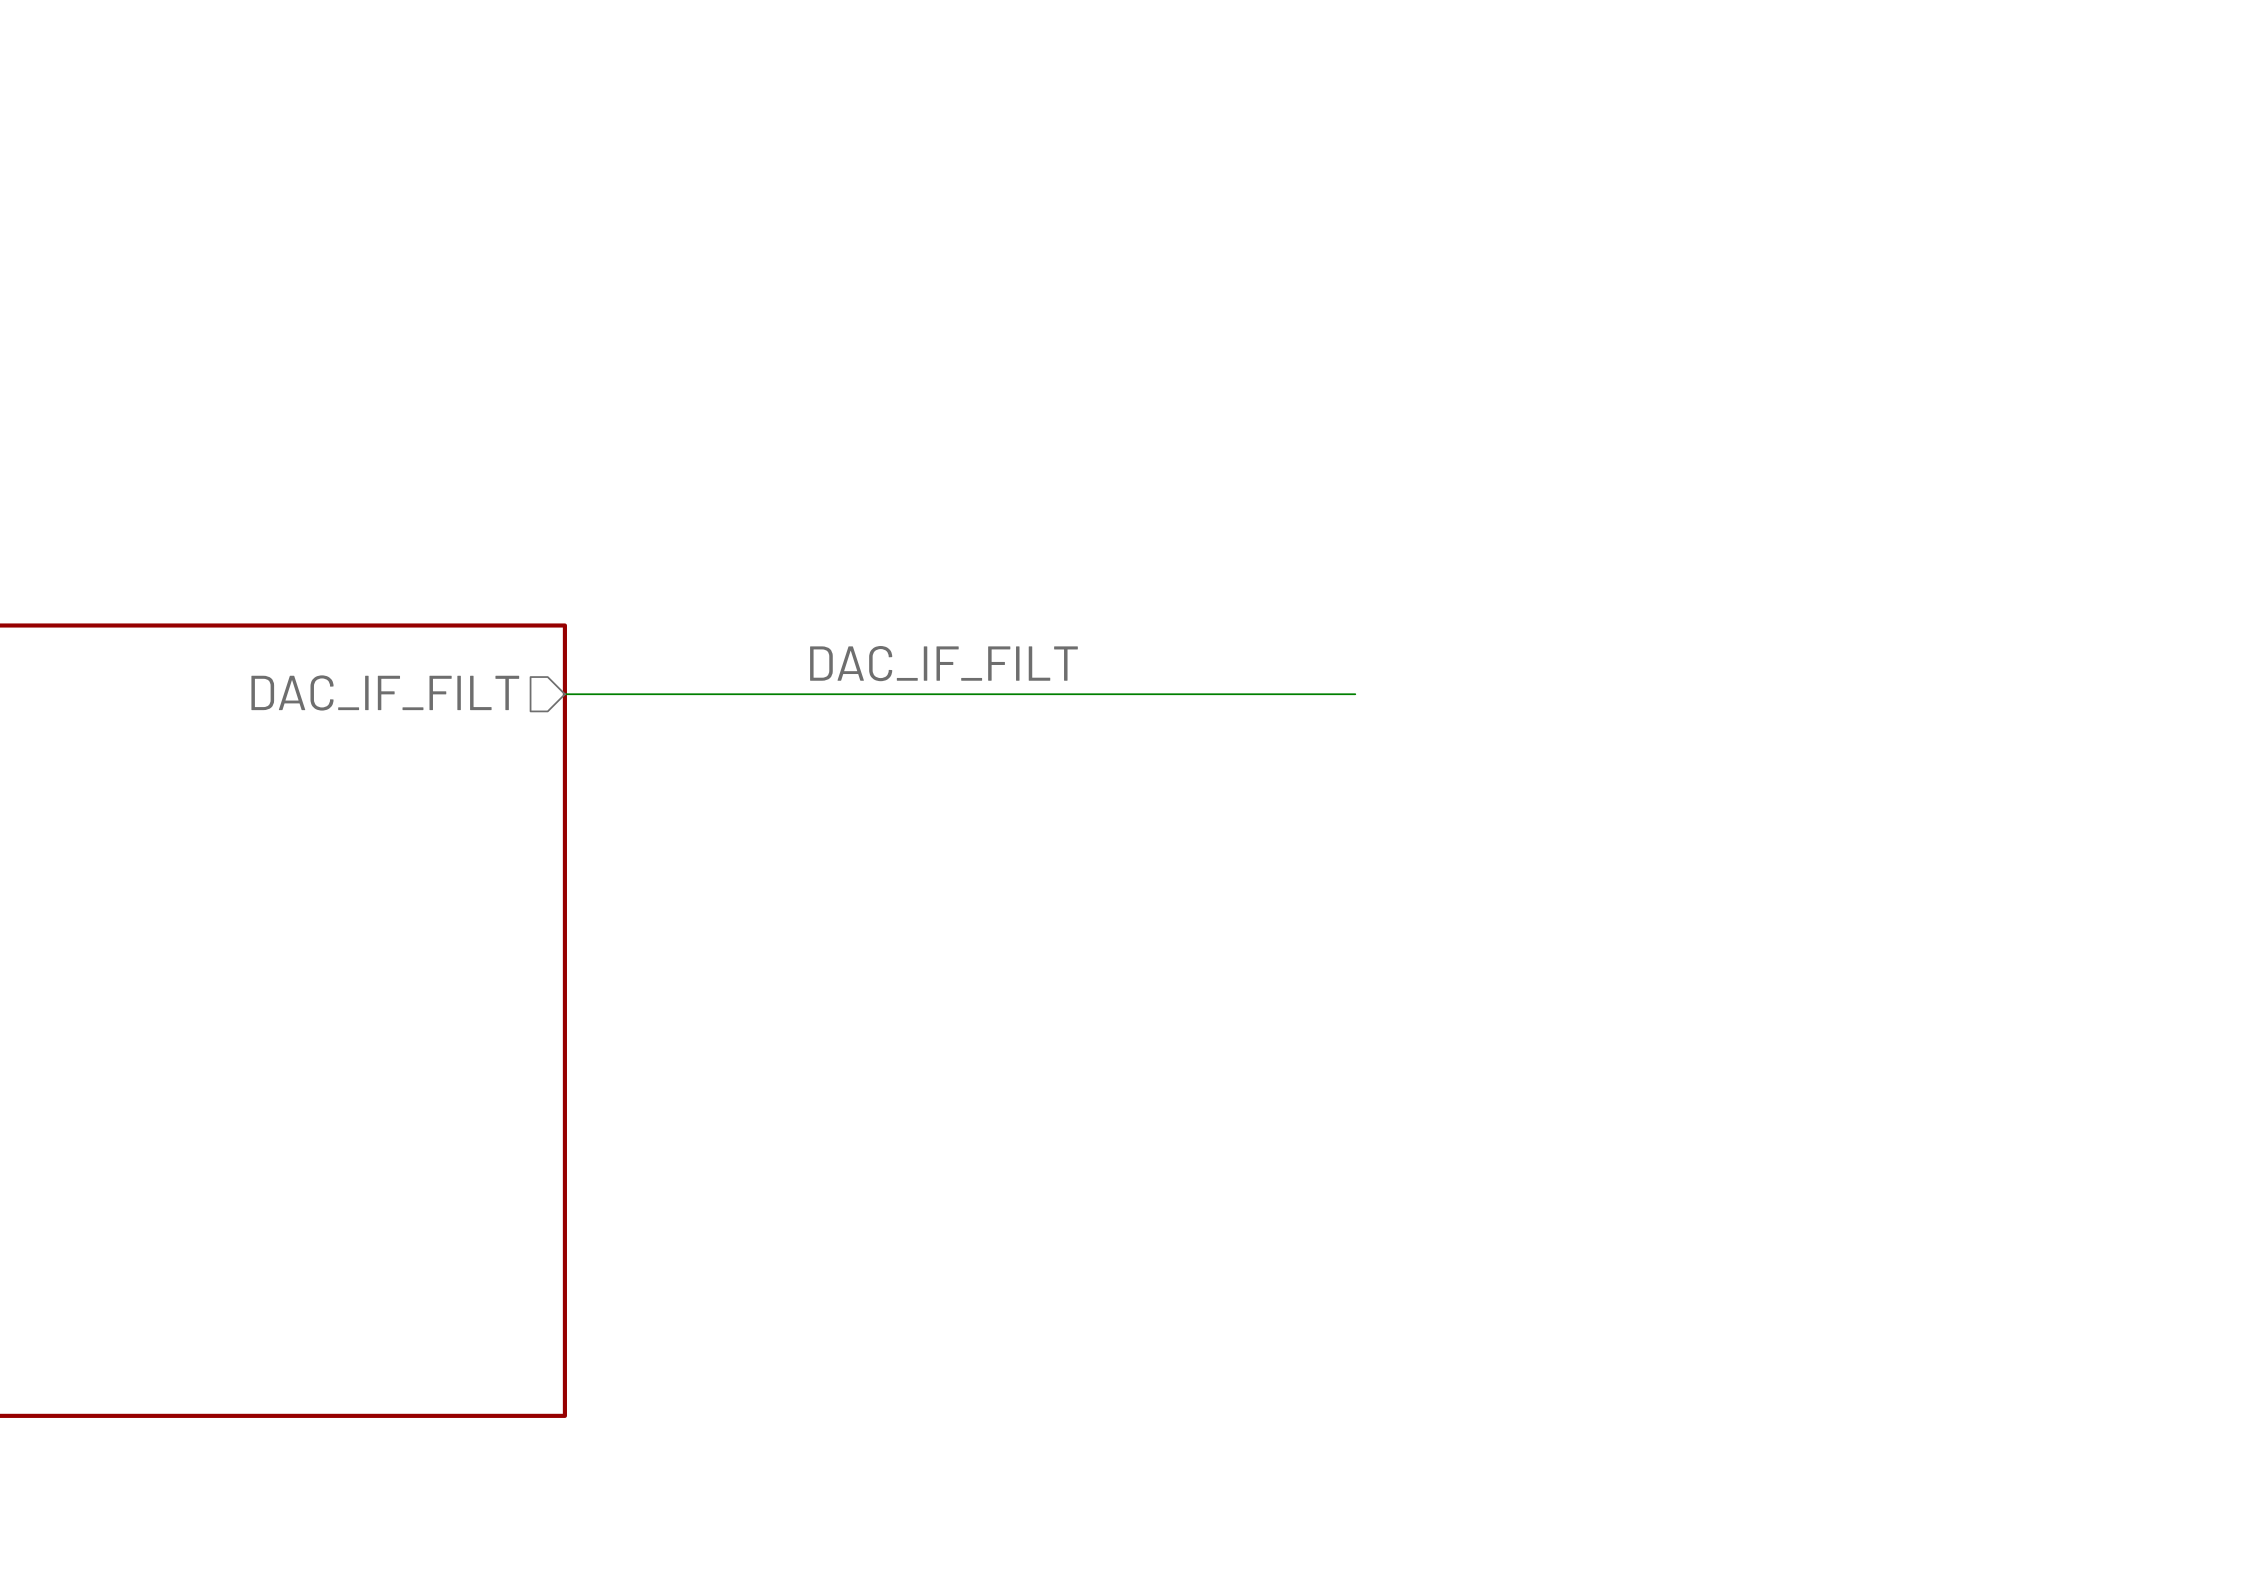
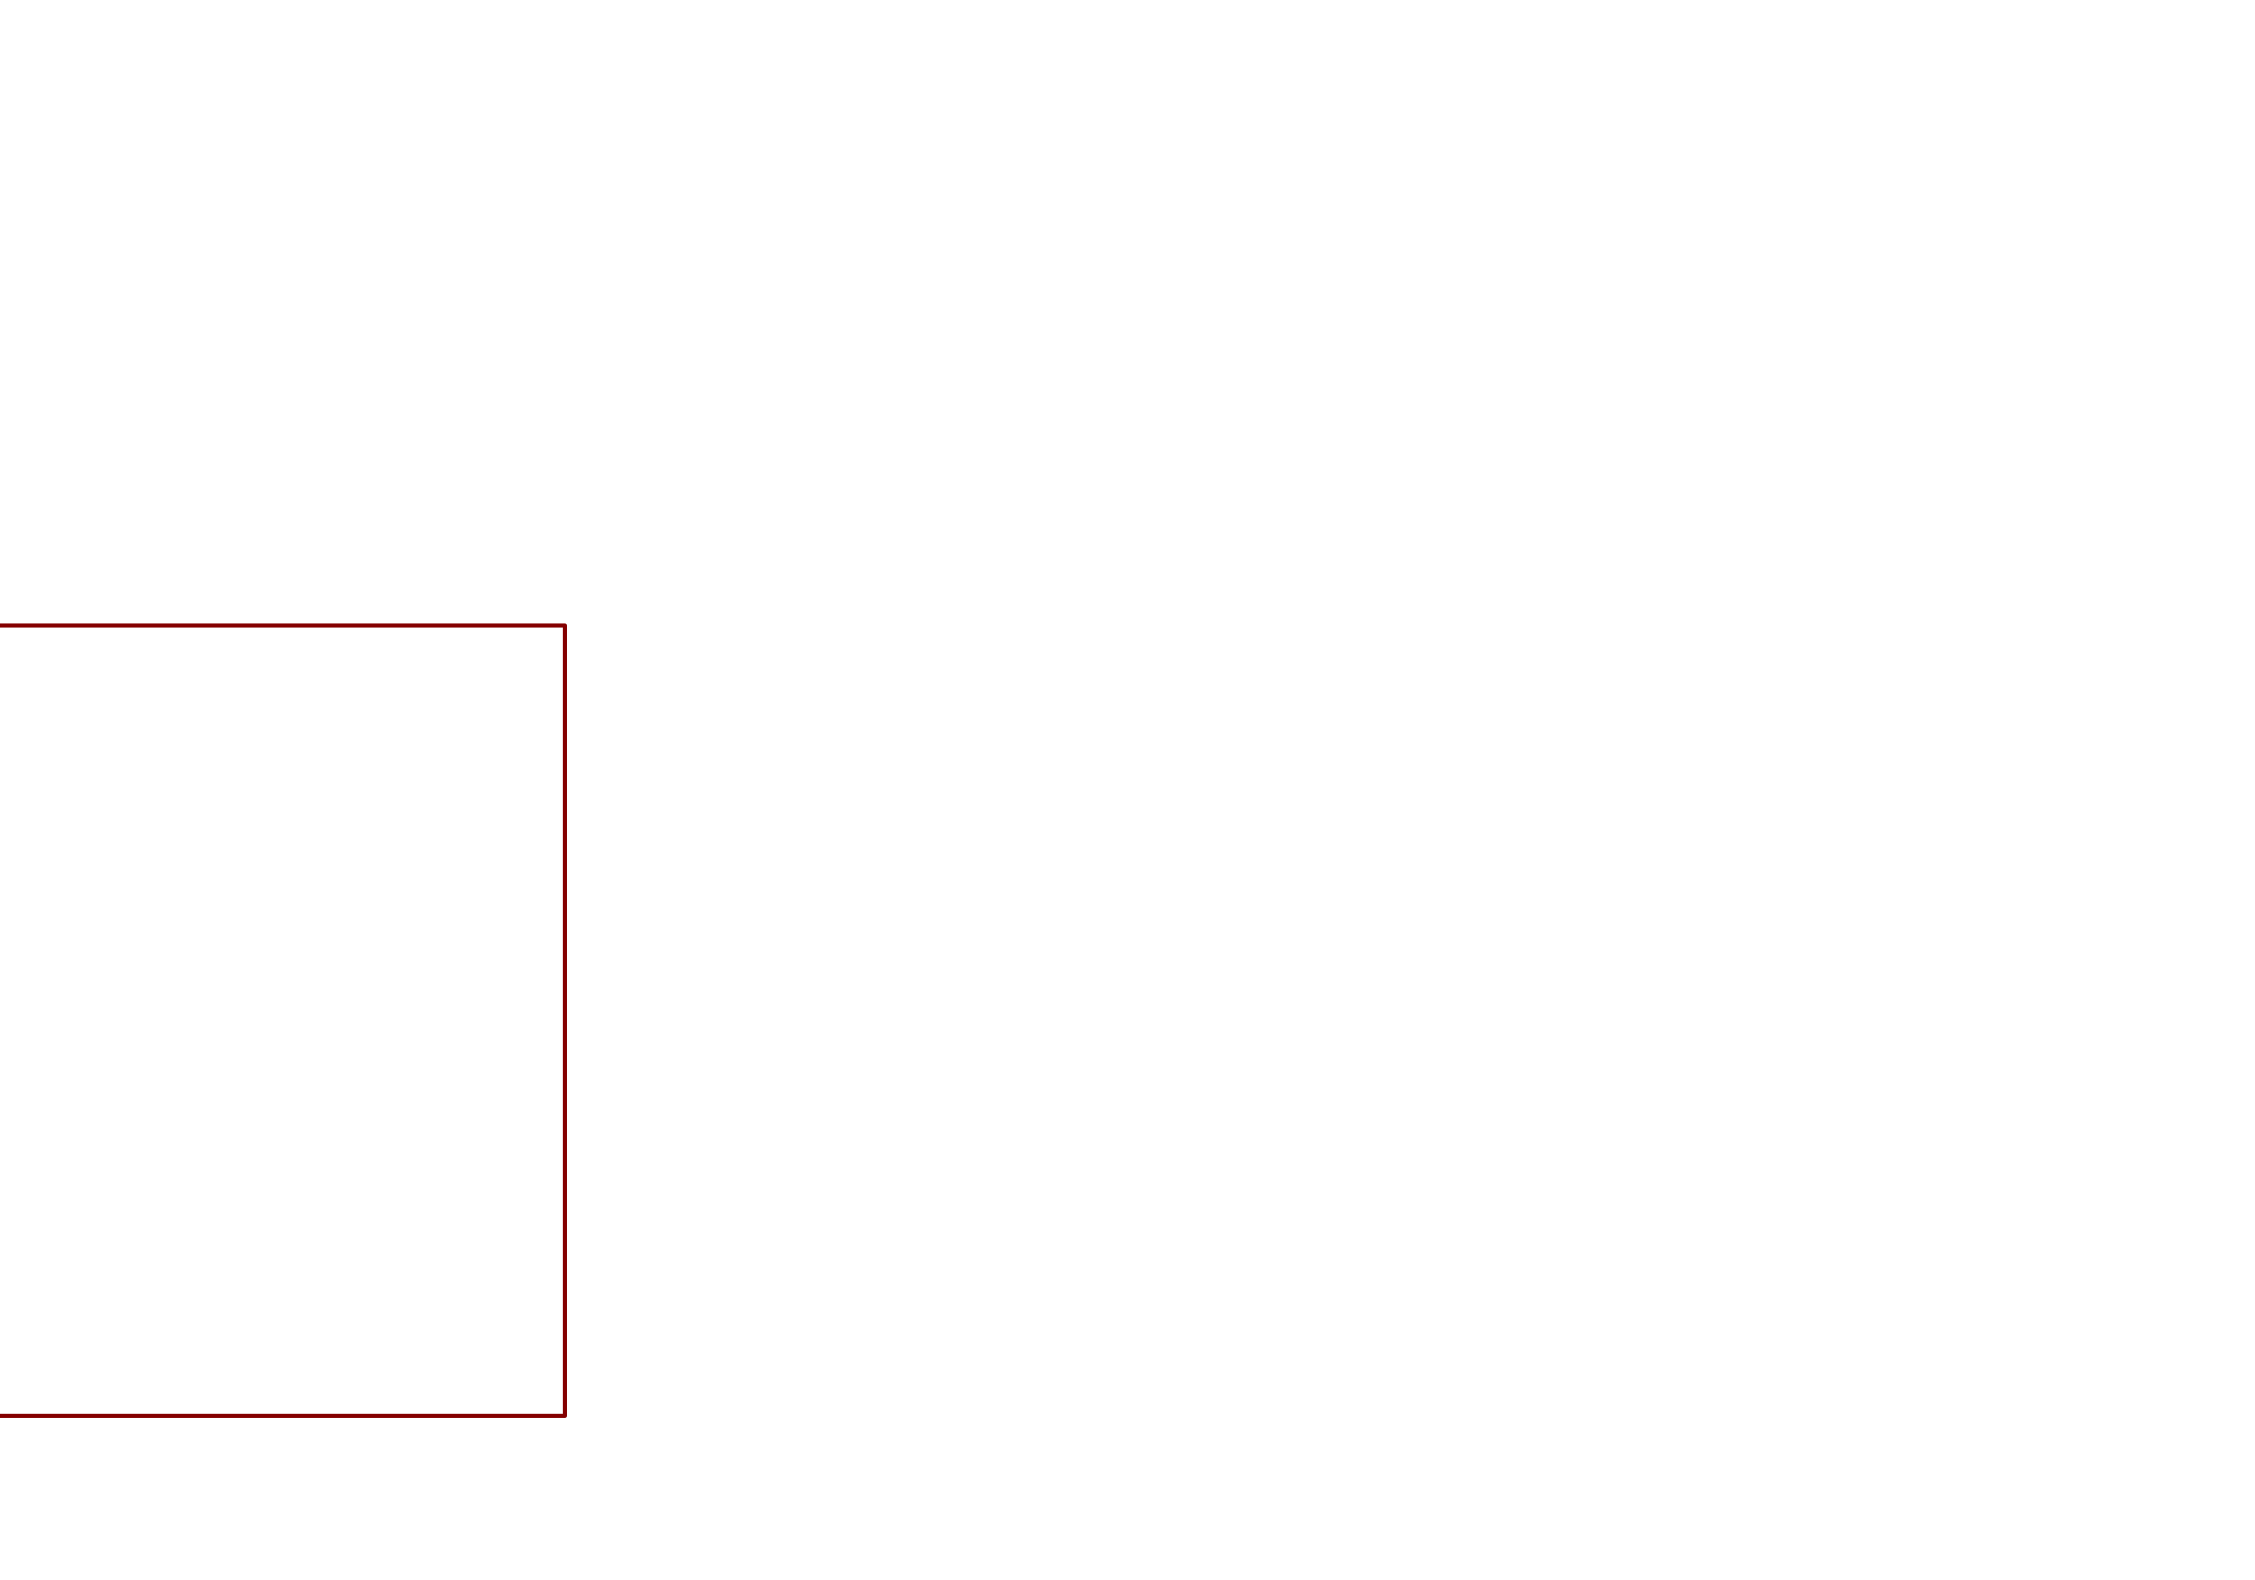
label: DAC_IF_FILT (943, 663) -> none
sheet pin: DAC_IF_FILT (385, 692) -> none
wire: (564, 694) (1355, 694) -> none

